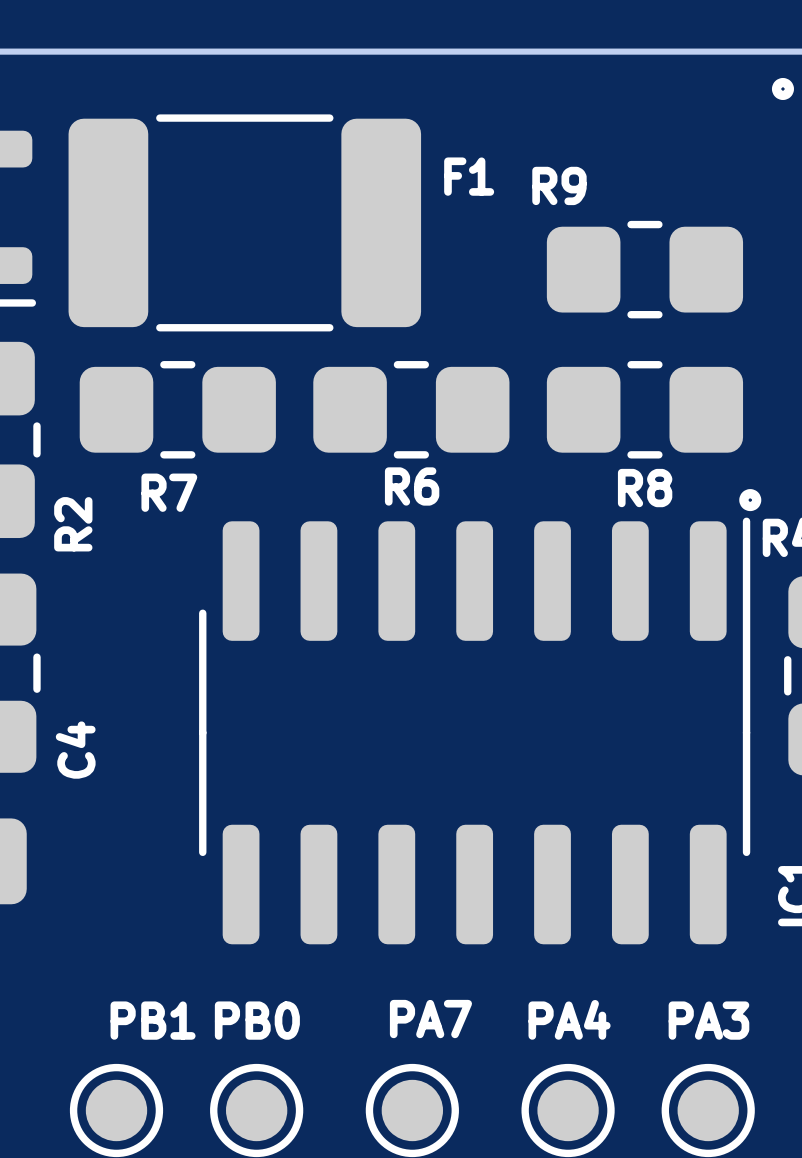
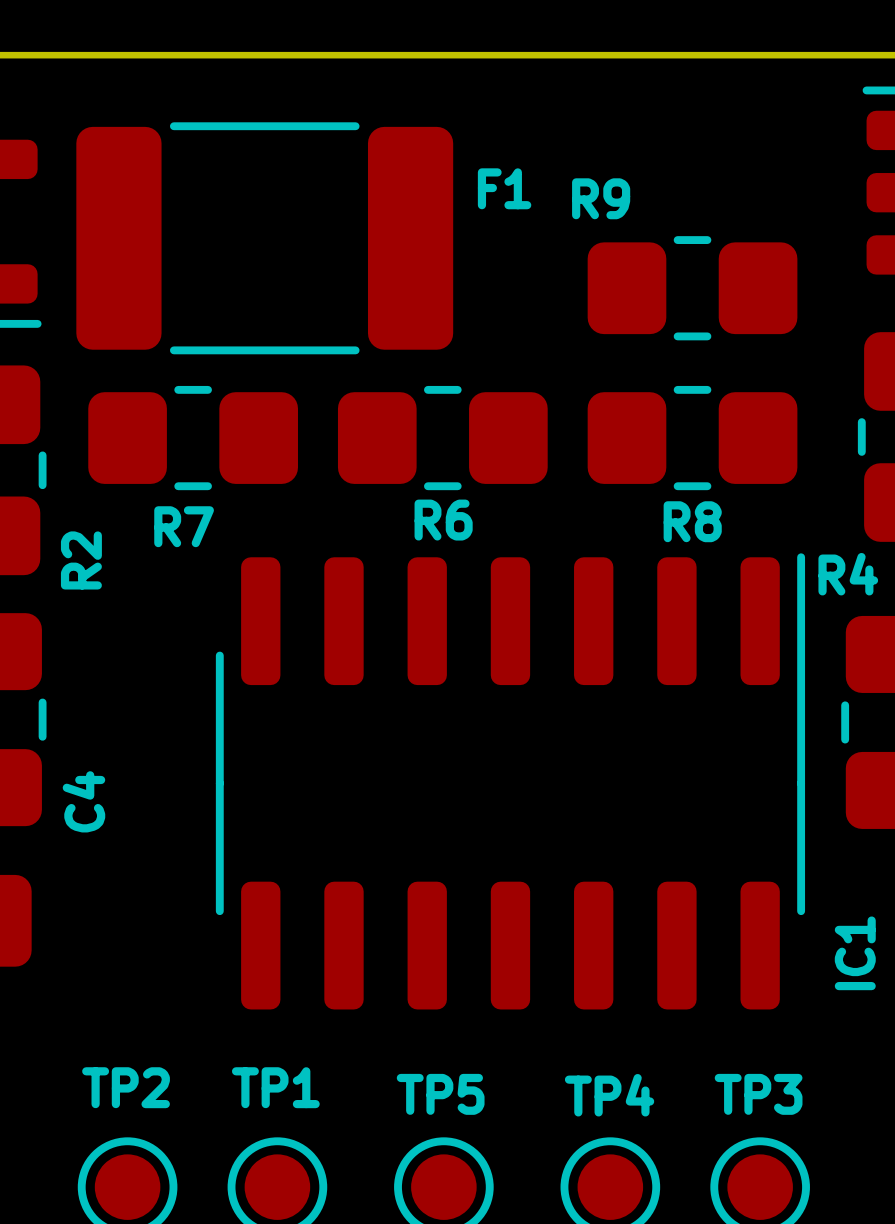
drawing: [771, 77, 794, 101] -> none
drawing: [739, 489, 762, 512] -> none
PA7 name: PA7 (430, 1019) -> TP5 (440, 1094)
PA4 name: PA4 (569, 1019) -> TP4 (609, 1095)
PB1 name: PB1 (153, 1020) -> TP2 (126, 1087)
PB0 name: PB0 (257, 1020) -> TP1 (275, 1087)
PA3 name: PA3 (708, 1020) -> TP3 (758, 1094)

